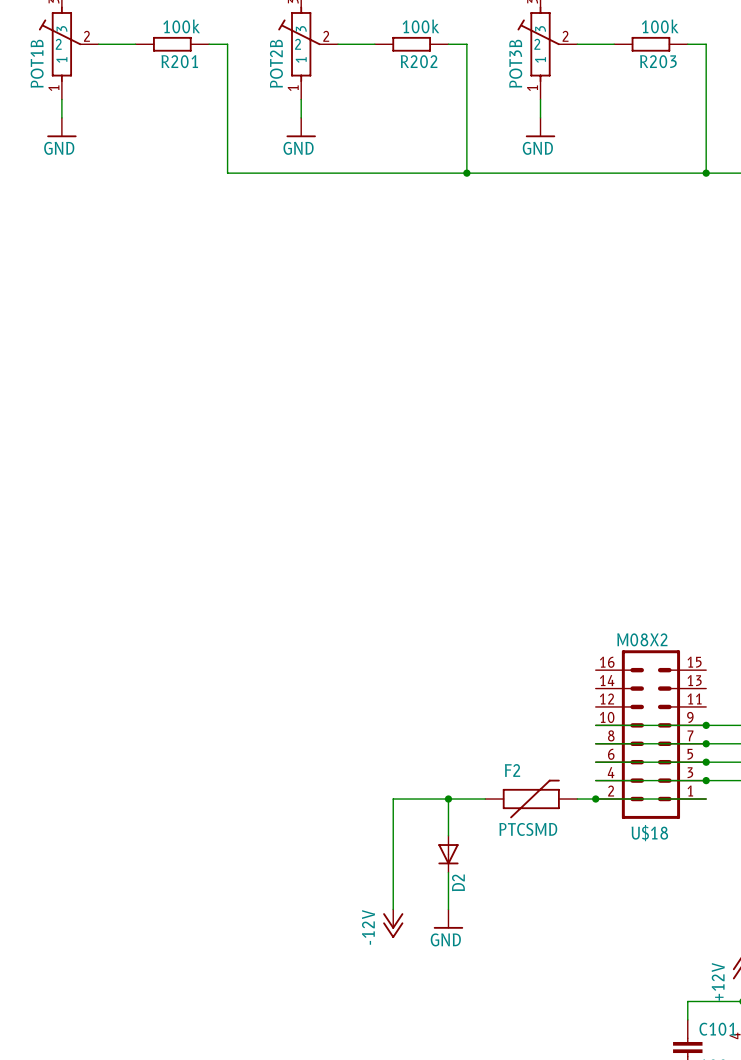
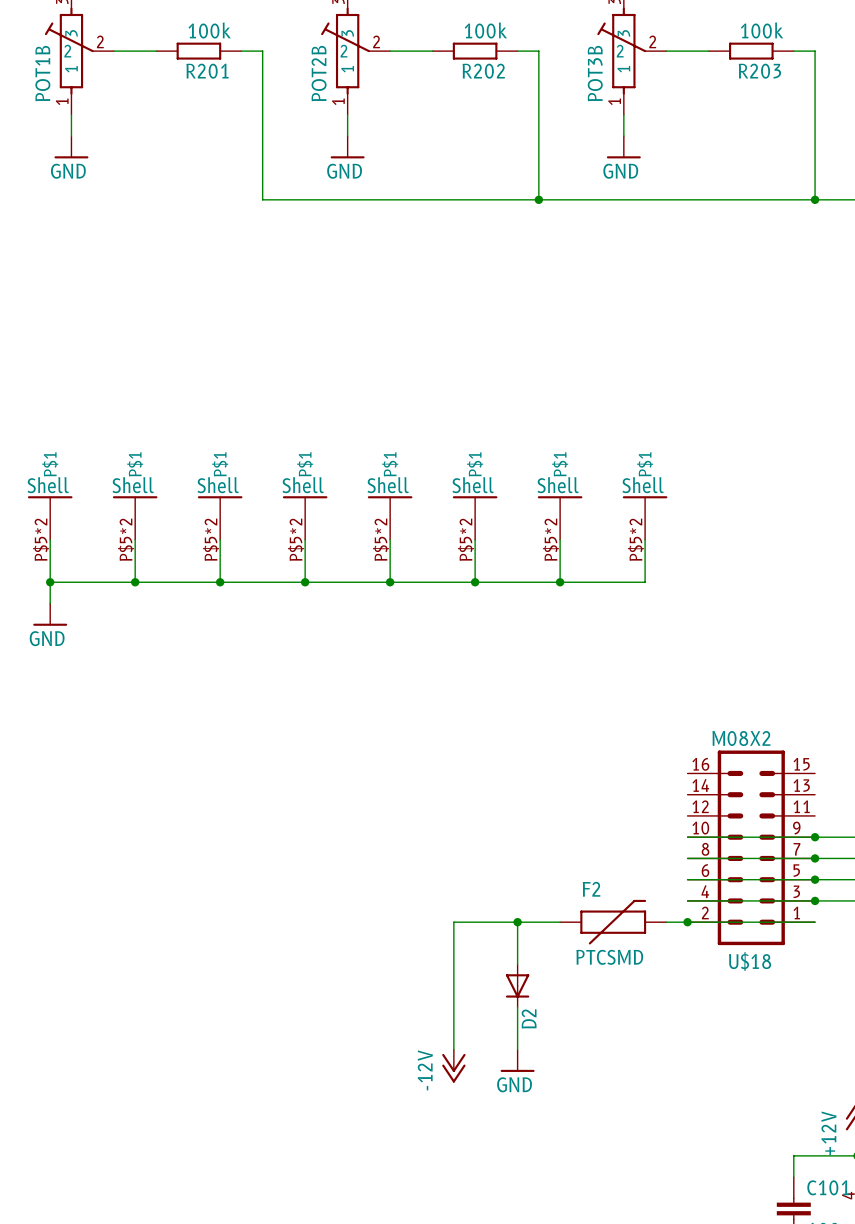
part: none -> (50, 517)
part: none -> (135, 517)
part: none -> (220, 517)
part: none -> (305, 517)
part: none -> (390, 517)
part: none -> (475, 517)
part: none -> (560, 517)
part: none -> (645, 517)
wire: none -> (50, 539) (50, 603)
wire: none -> (135, 539) (135, 582)
wire: none -> (220, 539) (220, 582)
wire: none -> (305, 539) (305, 582)
wire: none -> (390, 539) (390, 582)
wire: none -> (475, 539) (475, 582)
wire: none -> (560, 539) (560, 582)
wire: none -> (645, 539) (645, 582) (50, 582)
junction: none -> (50, 582)
junction: none -> (135, 582)
junction: none -> (220, 582)
junction: none -> (305, 582)
junction: none -> (390, 582)
junction: none -> (475, 582)
junction: none -> (560, 582)
power symbol: none -> GND (50, 614)

